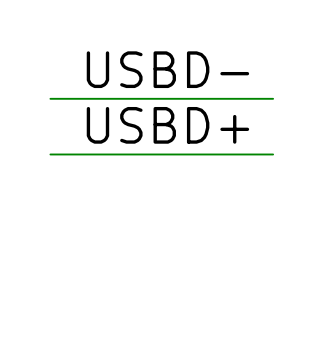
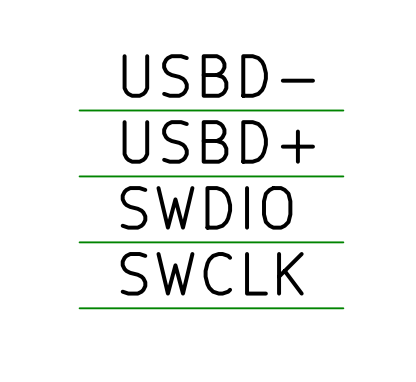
label: none -> SWDIO (206, 207)
wire: none -> (79, 242) (343, 242)
label: none -> SWCLK (212, 273)
wire: none -> (79, 308) (343, 308)

